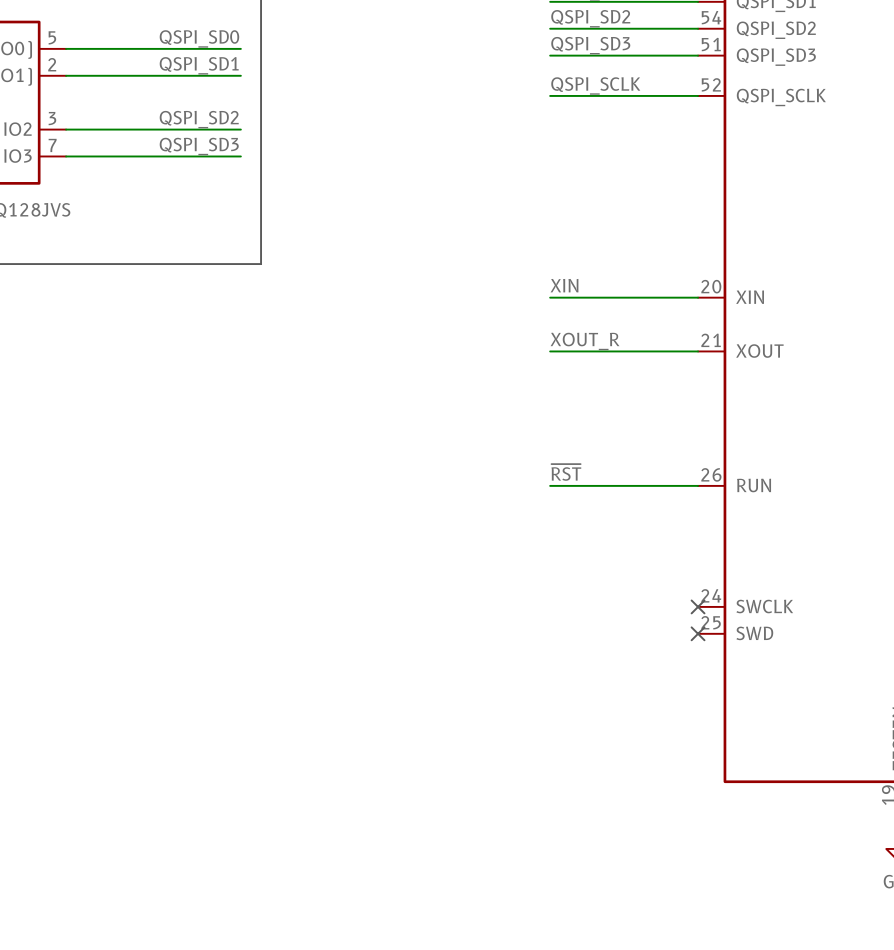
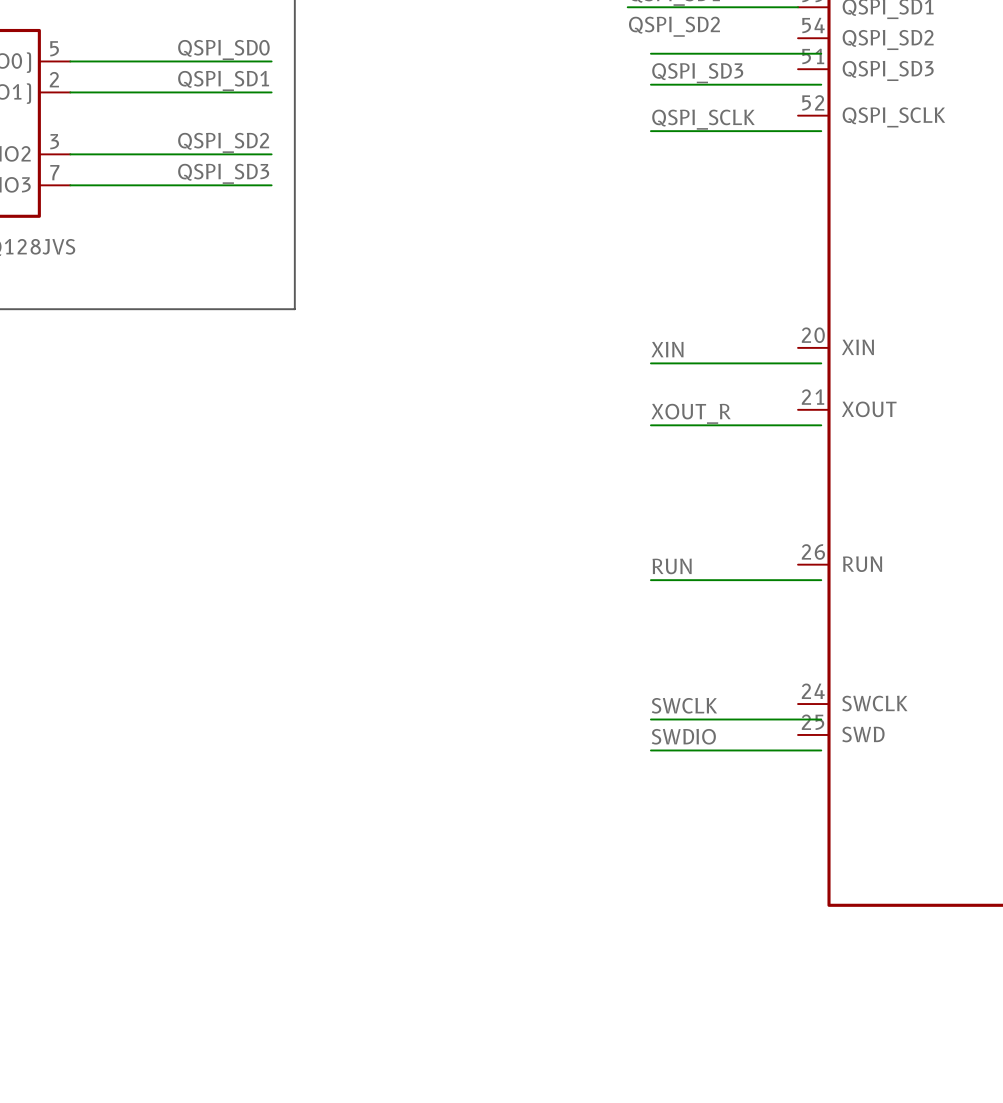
wire: (550, 28) (698, 28) -> (650, 53) (821, 53)
label position: QSPI_SD3 (590, 45) -> QSPI_SD3 (697, 73)
wire: (550, 55) (698, 55) -> (650, 84) (821, 84)
label position: QSPI_SCLK (595, 85) -> QSPI_SCLK (703, 119)
wire: (550, 95) (698, 95) -> (650, 131) (821, 131)
label position: XIN (564, 285) -> XIN (667, 349)
wire: (550, 297) (698, 297) -> (650, 363) (821, 363)
label position: XOUT_R (585, 341) -> XOUT_R (691, 413)
wire: (550, 351) (698, 351) -> (650, 425) (821, 425)
label: ~{RST} (566, 472) -> none
wire: (550, 485) (698, 485) -> (650, 580) (821, 580)
label: none -> RUN (672, 566)
no-connect mark: (698, 606) -> none
label: none -> SWCLK (684, 705)
wire: none -> (650, 719) (821, 719)
no-connect mark: (698, 633) -> none
label: none -> SWDIO (683, 736)
wire: none -> (650, 750) (821, 750)

